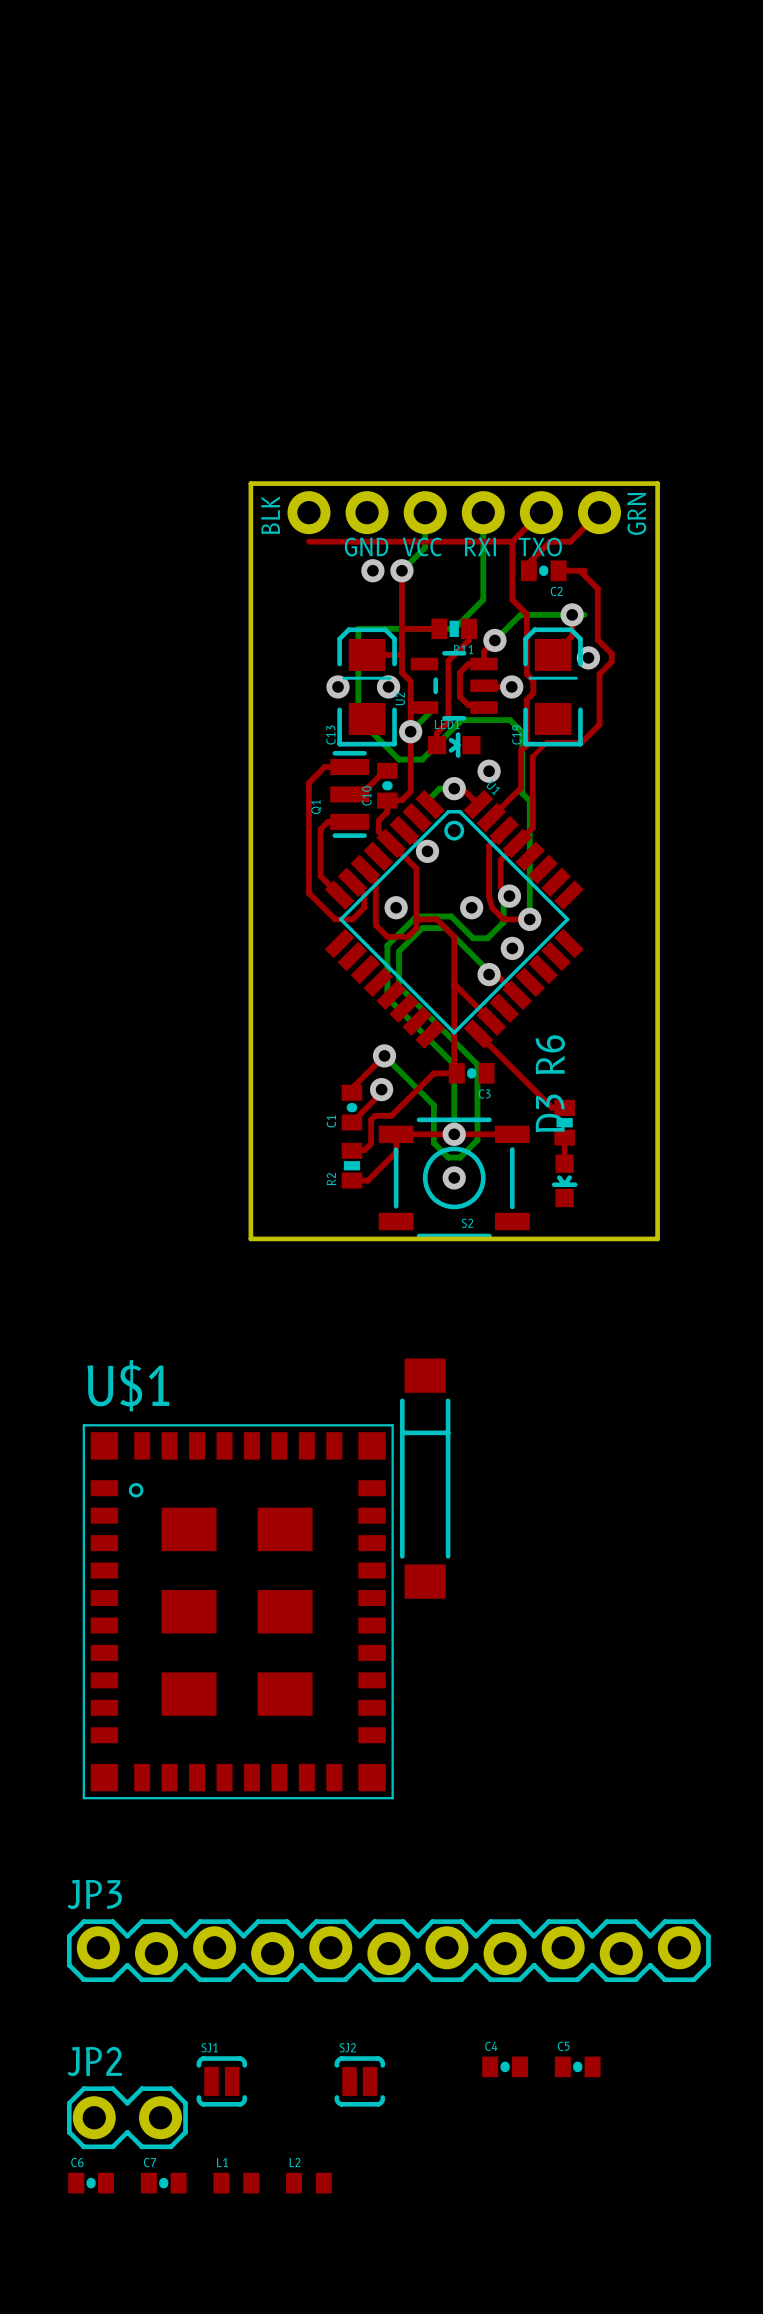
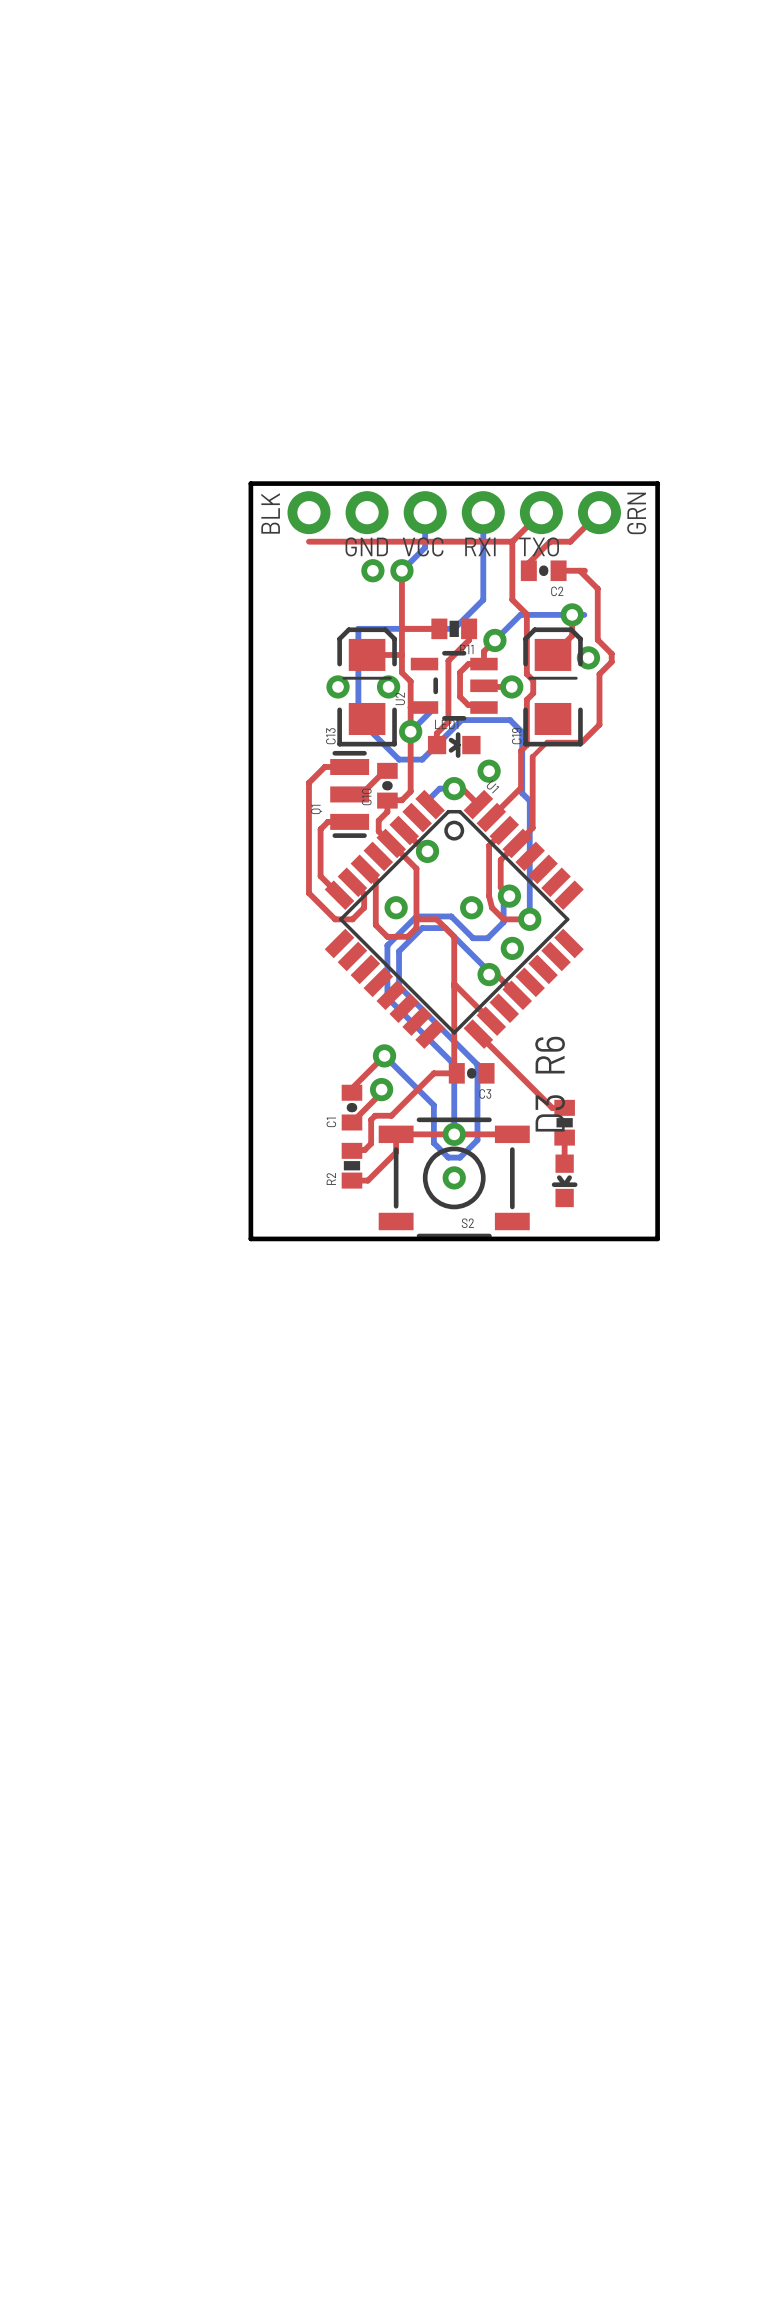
part: (425, 1478) -> none
U$1: (238, 1611) -> none
JP3: (388, 1950) -> none
C4: (505, 2066) -> none
C5: (577, 2066) -> none
SJ1: (221, 2081) -> none
SJ2: (359, 2081) -> none
JP2: (127, 2117) -> none
C6: (91, 2183) -> none
C7: (163, 2183) -> none
L1: (236, 2183) -> none
L2: (308, 2183) -> none

